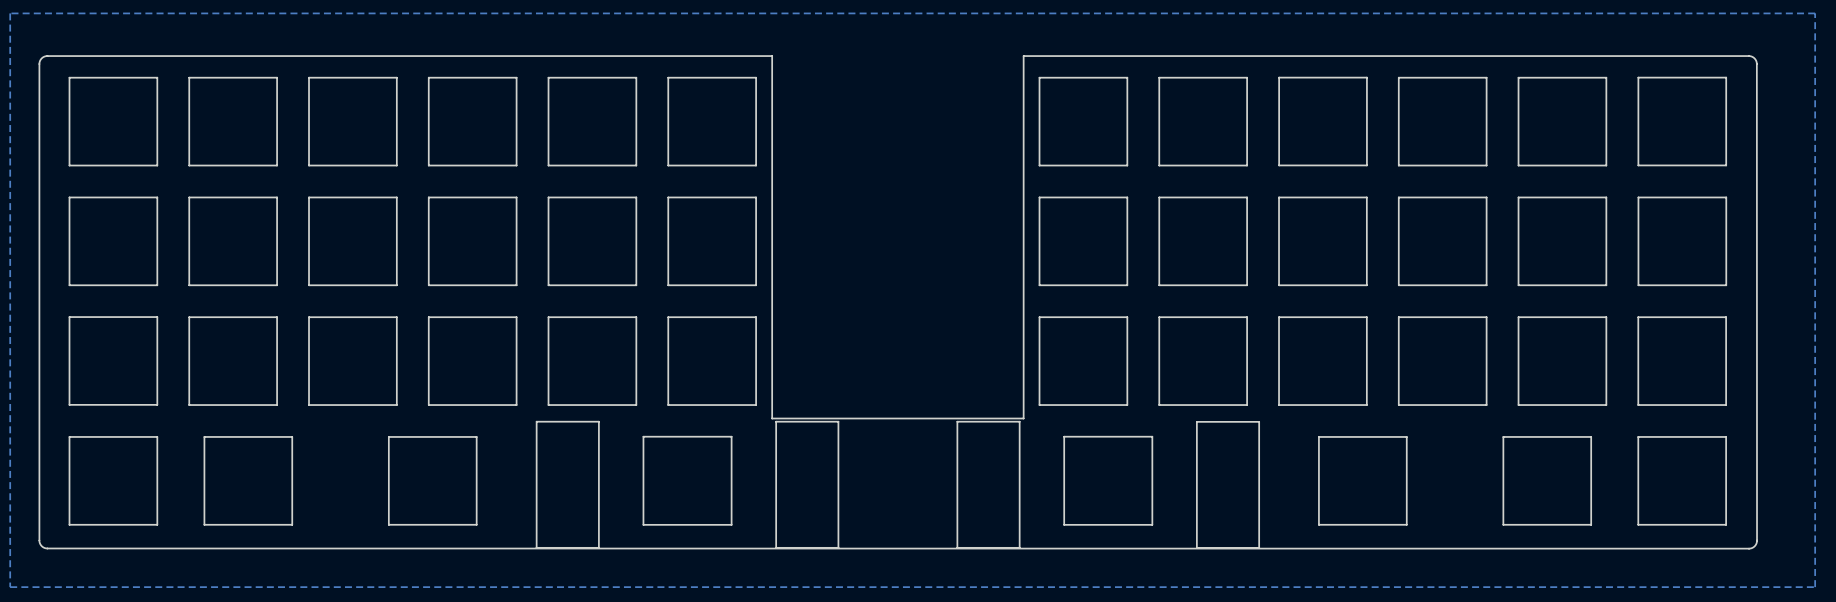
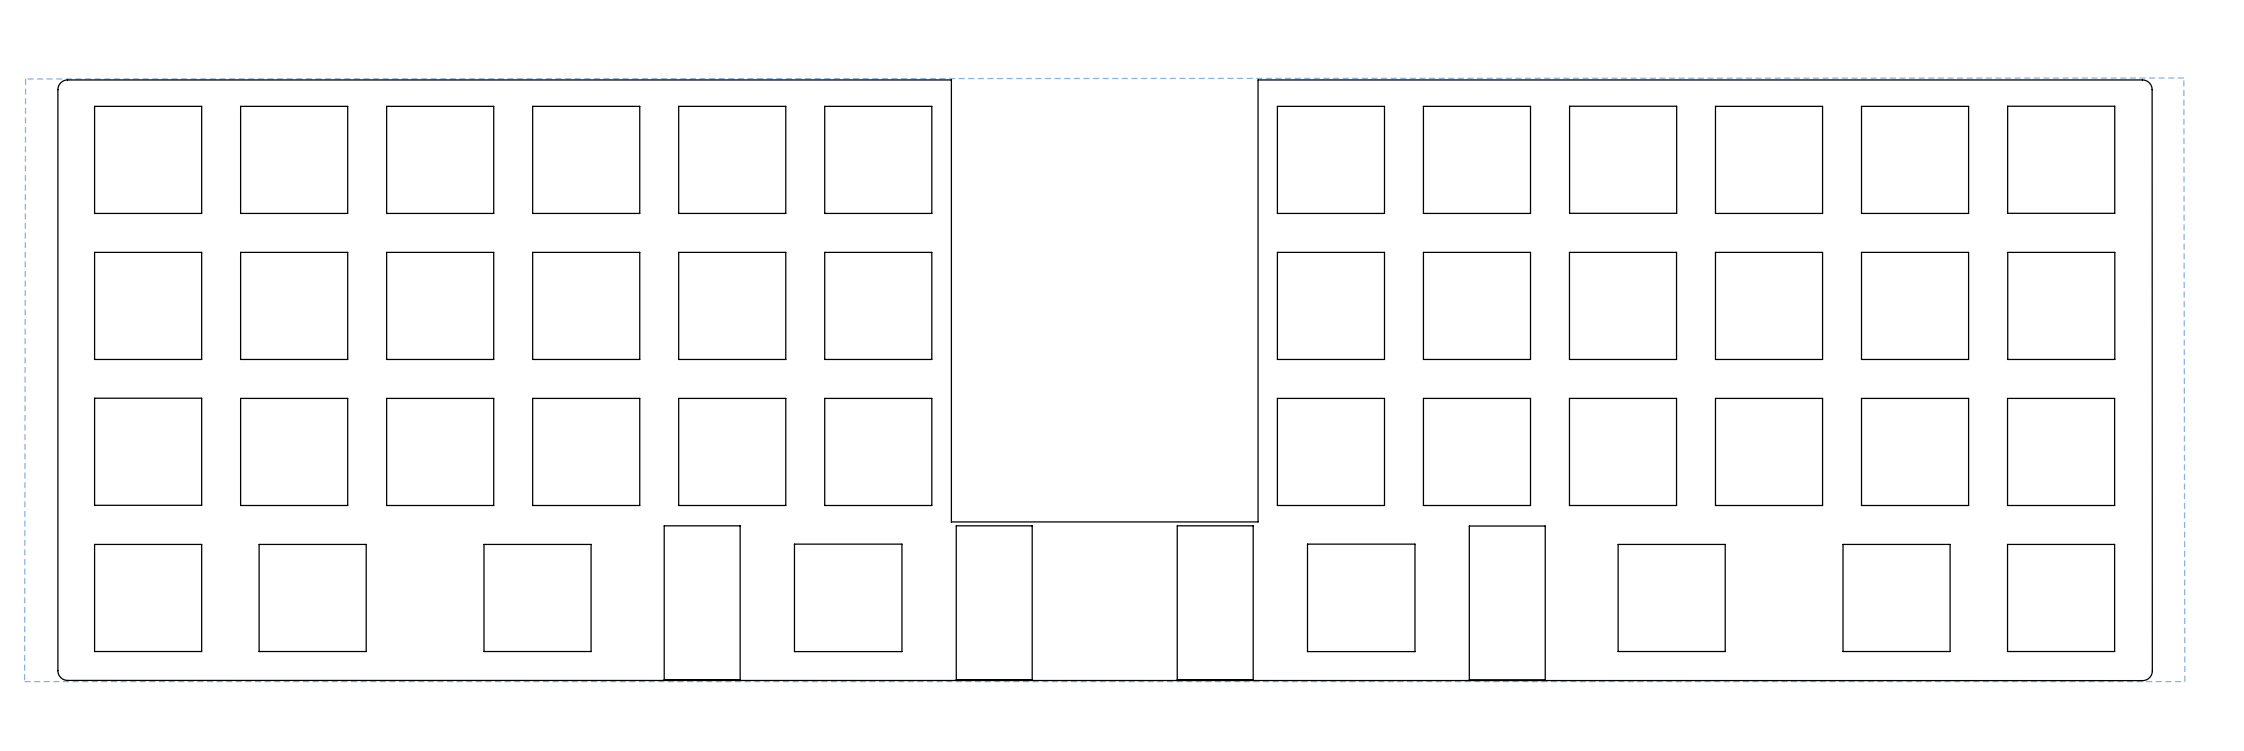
zone outline: (1815, 13) (1815, 587) (10, 587) (10, 13) (1815, 13) -> (2183, 78) (2184, 681) (24, 681) (25, 78) (2183, 78)

